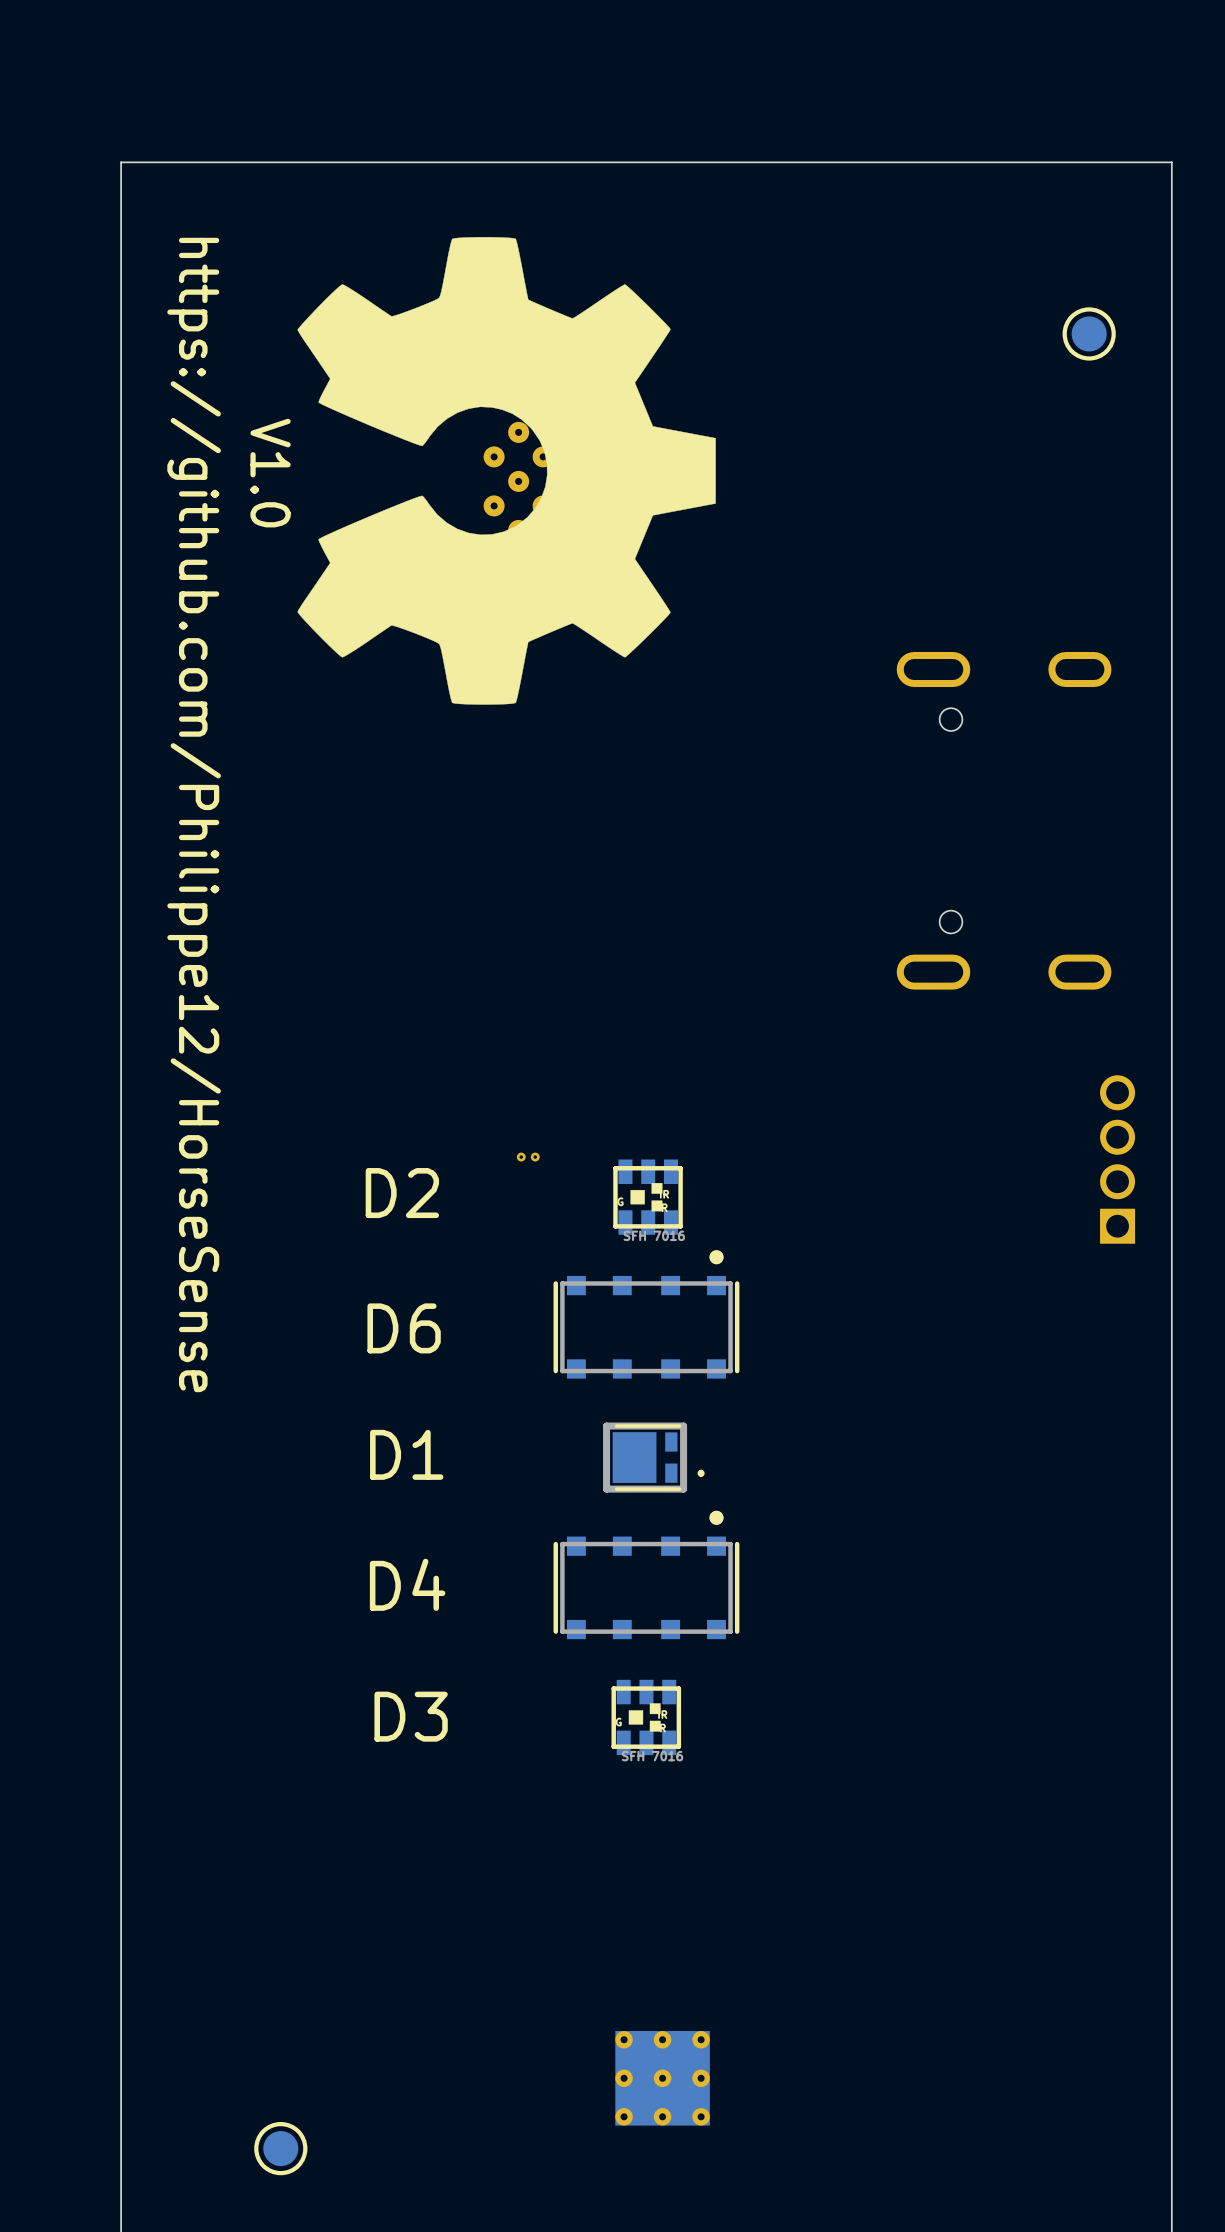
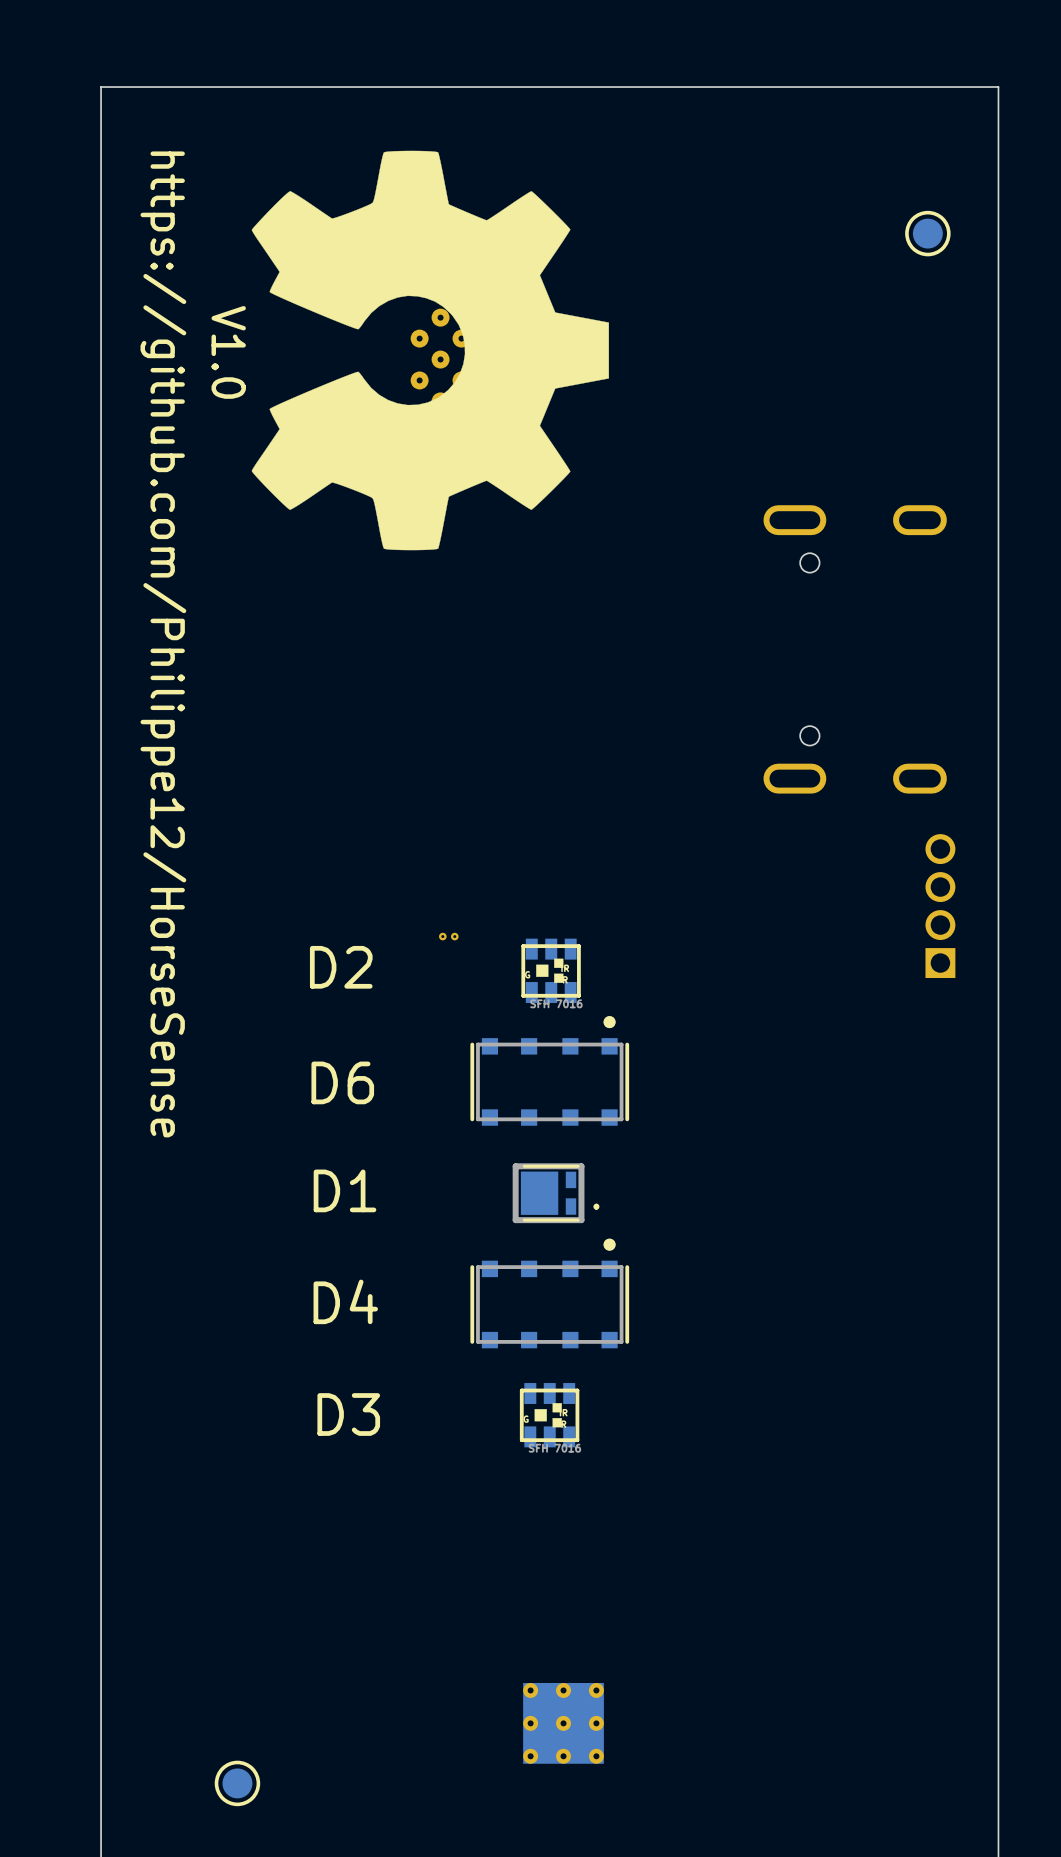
part position: (1117, 1159) -> (940, 906)

